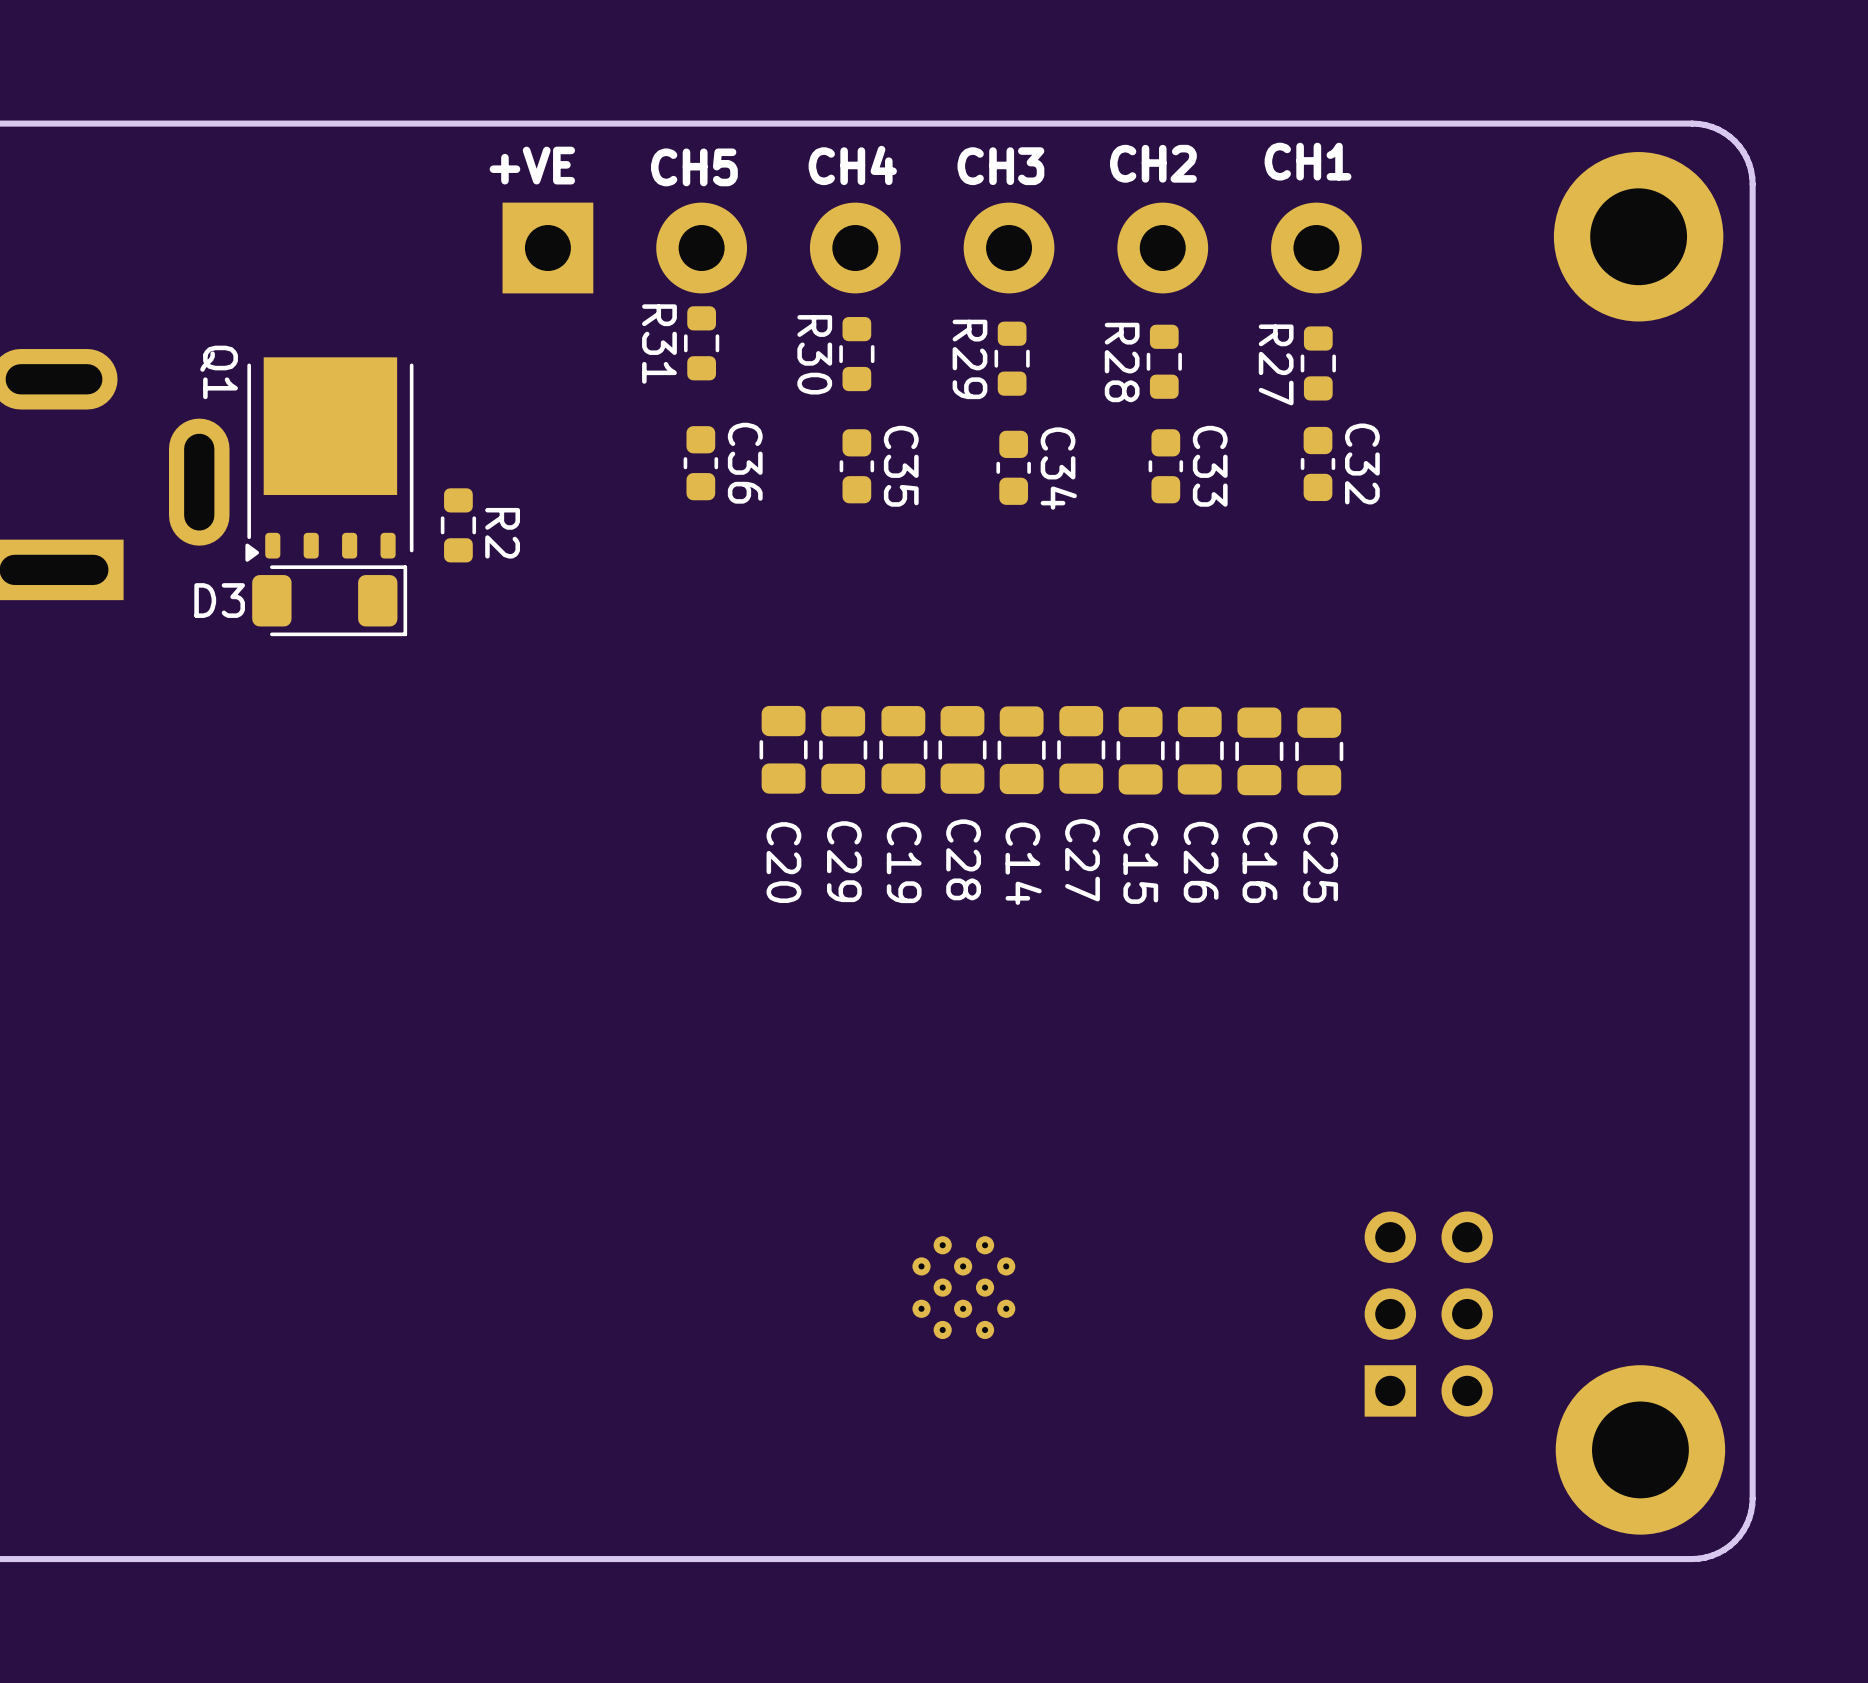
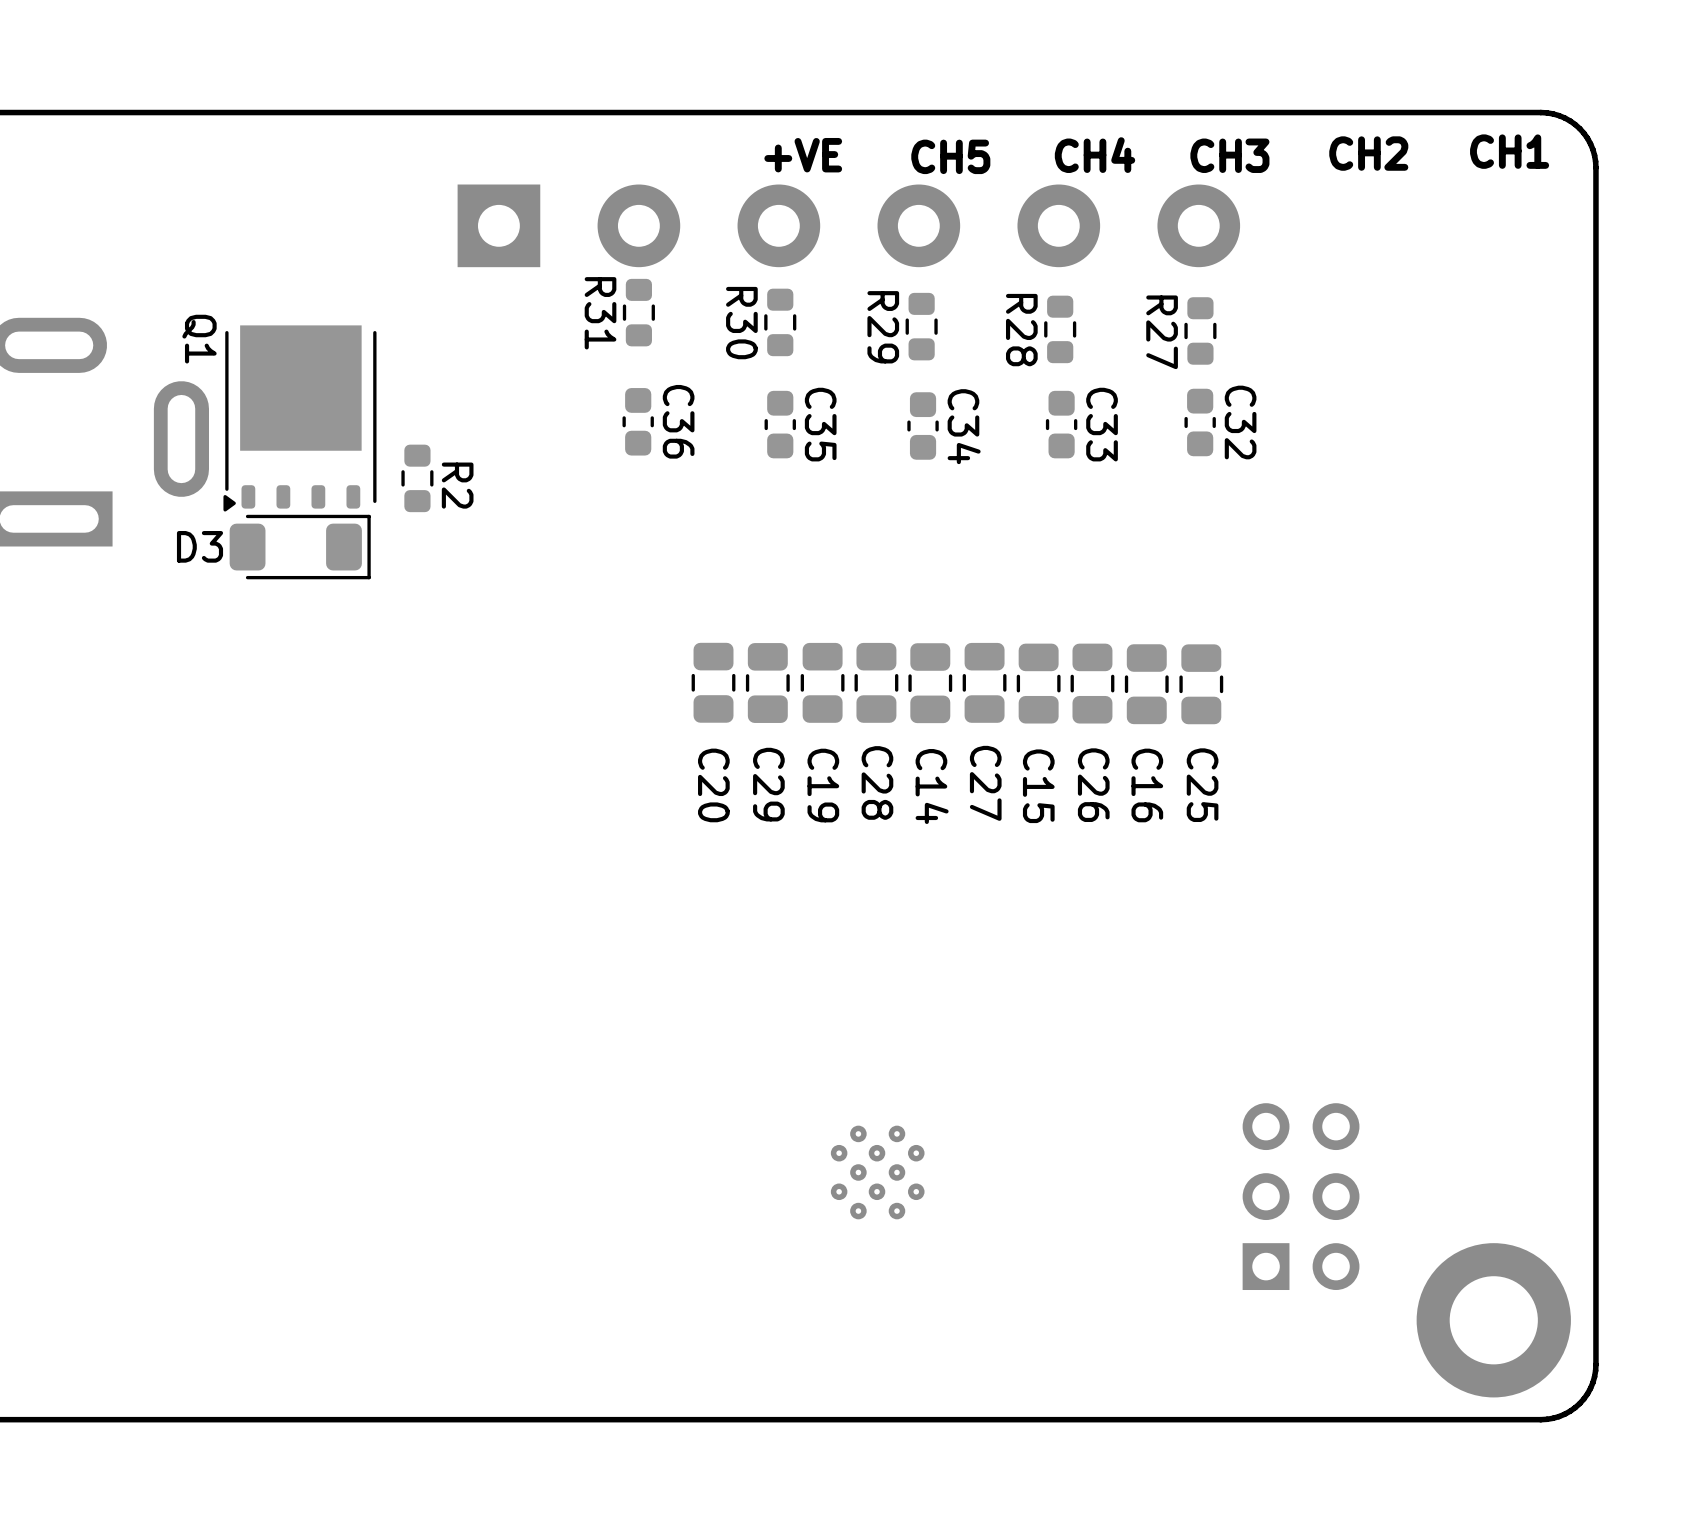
text position: CH1 (1308, 161) -> CH1 (1509, 151)
text position: CH2 (1153, 163) -> CH2 (1368, 153)
text: +VE (532, 165) -> none
text: CH4 (852, 165) -> +VE (803, 155)
text position: CH3 (1000, 166) -> CH3 (1229, 155)
text position: CH5 (694, 167) -> CH5 (950, 156)
text: none -> CH4 (1095, 155)
part: (1638, 236) -> none

